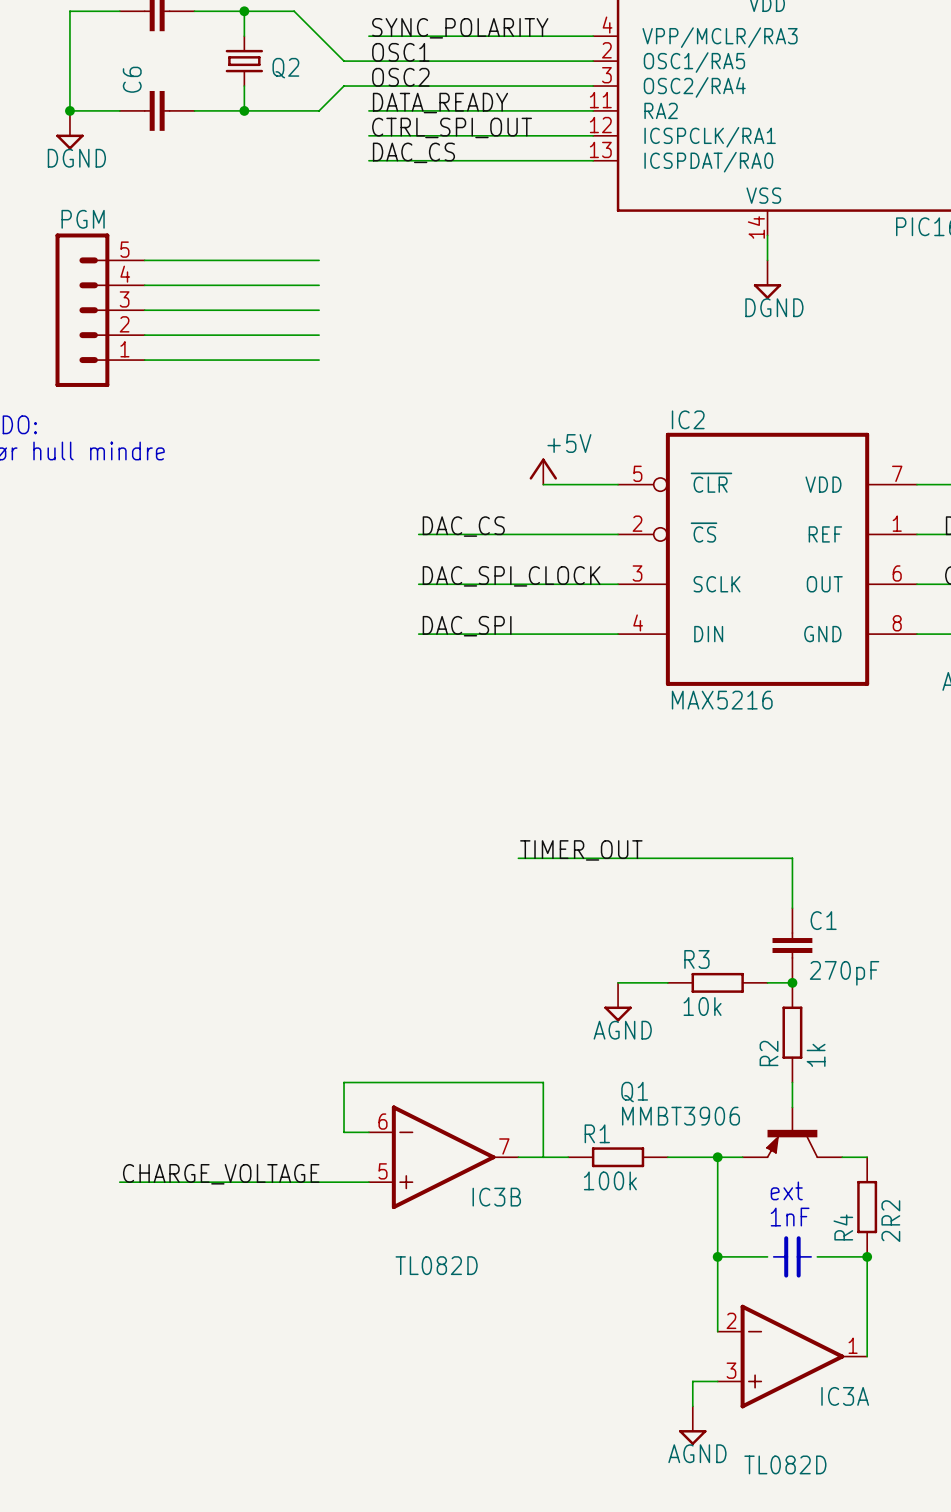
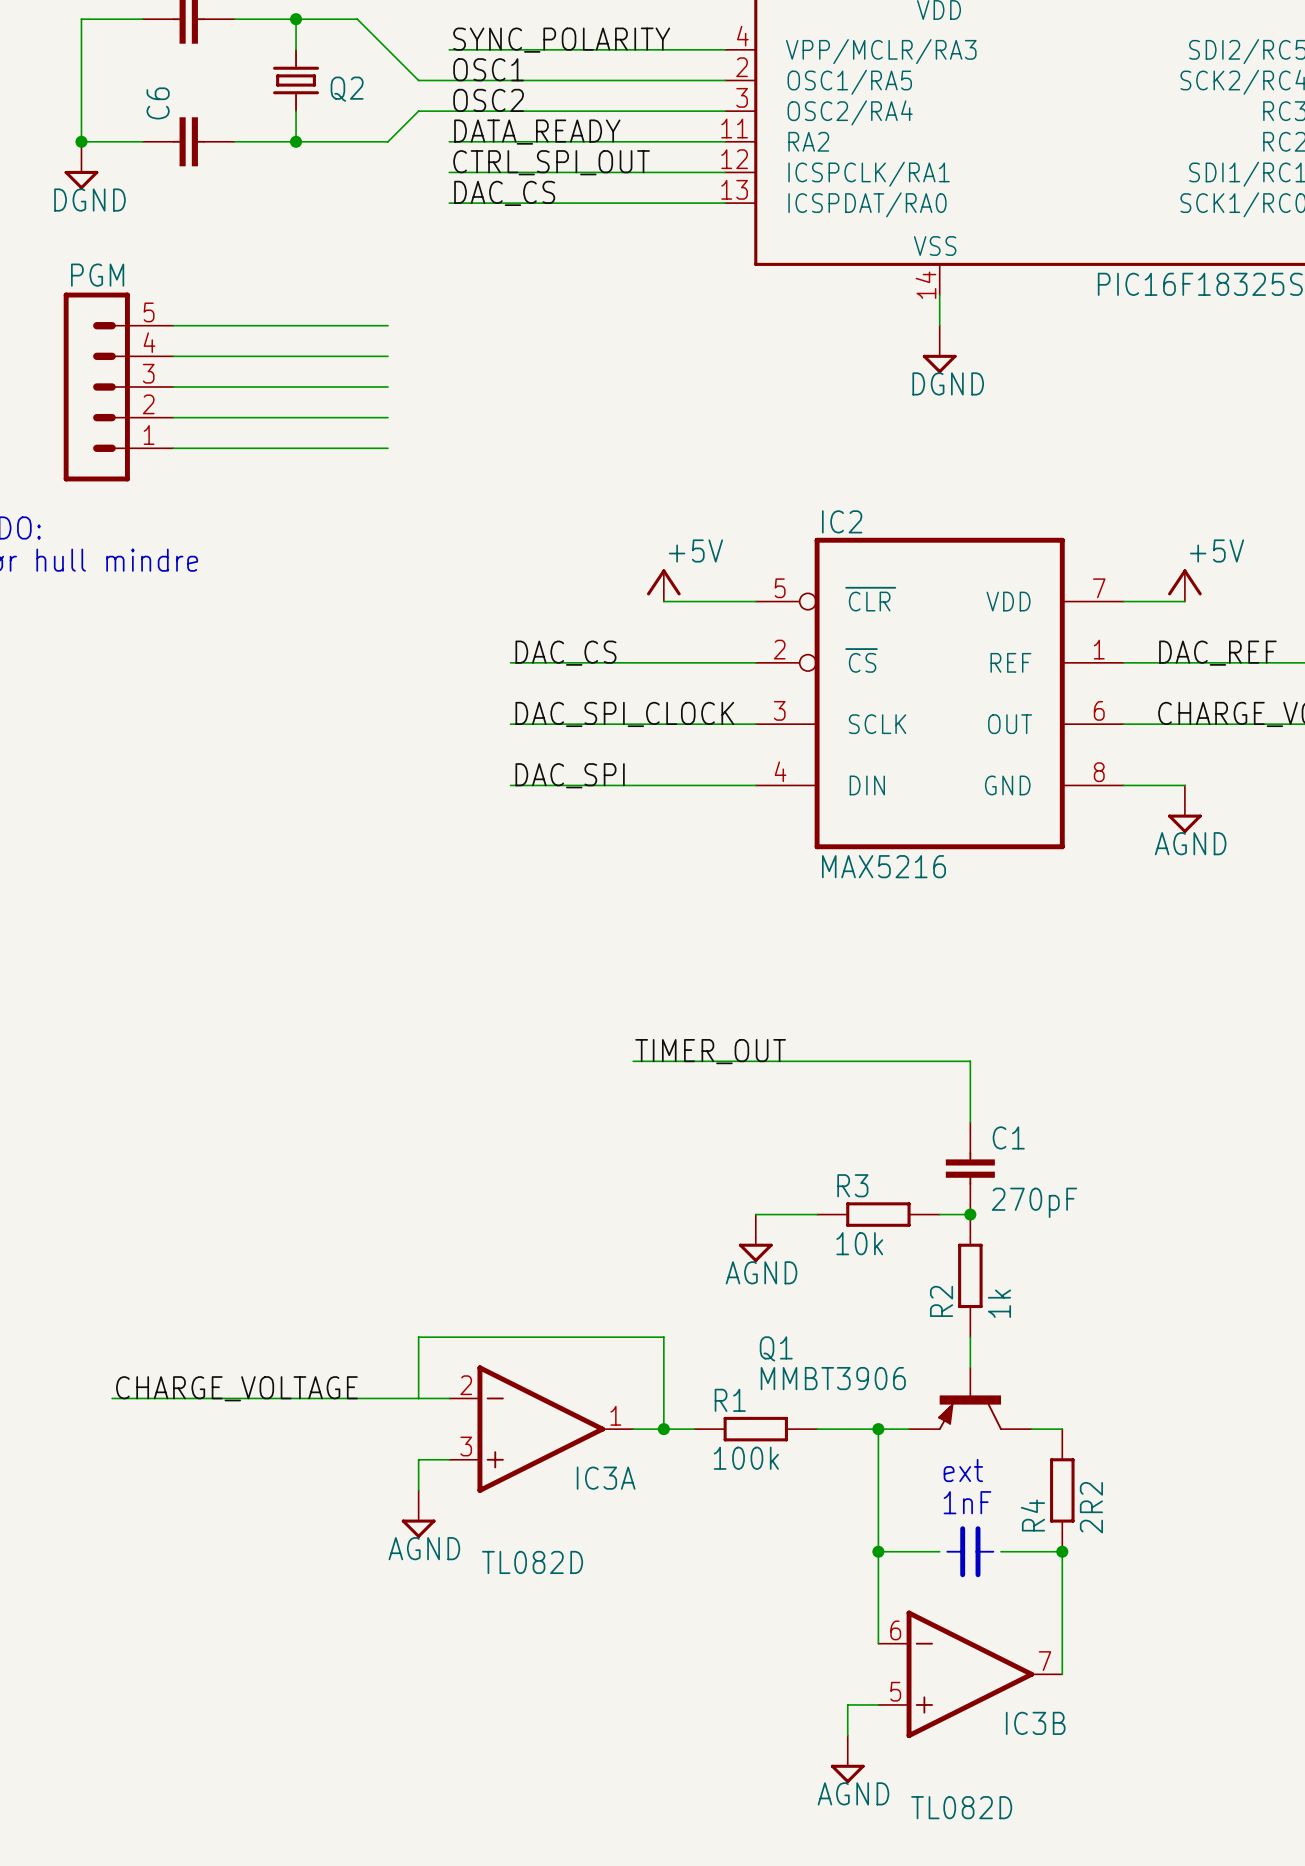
wire: none -> (112, 1398) (418, 1398)
IC3B position: (443, 1157) -> (970, 1674)
junction: none -> (663, 1429)
label position: CHARGE_VOLTAGE (221, 1174) -> CHARGE_VOLTAGE (236, 1388)
wire: (119, 1182) (344, 1182) -> (418, 1490) (418, 1459)
power symbol: none -> AGND (418, 1514)
IC3A position: (792, 1356) -> (541, 1429)

